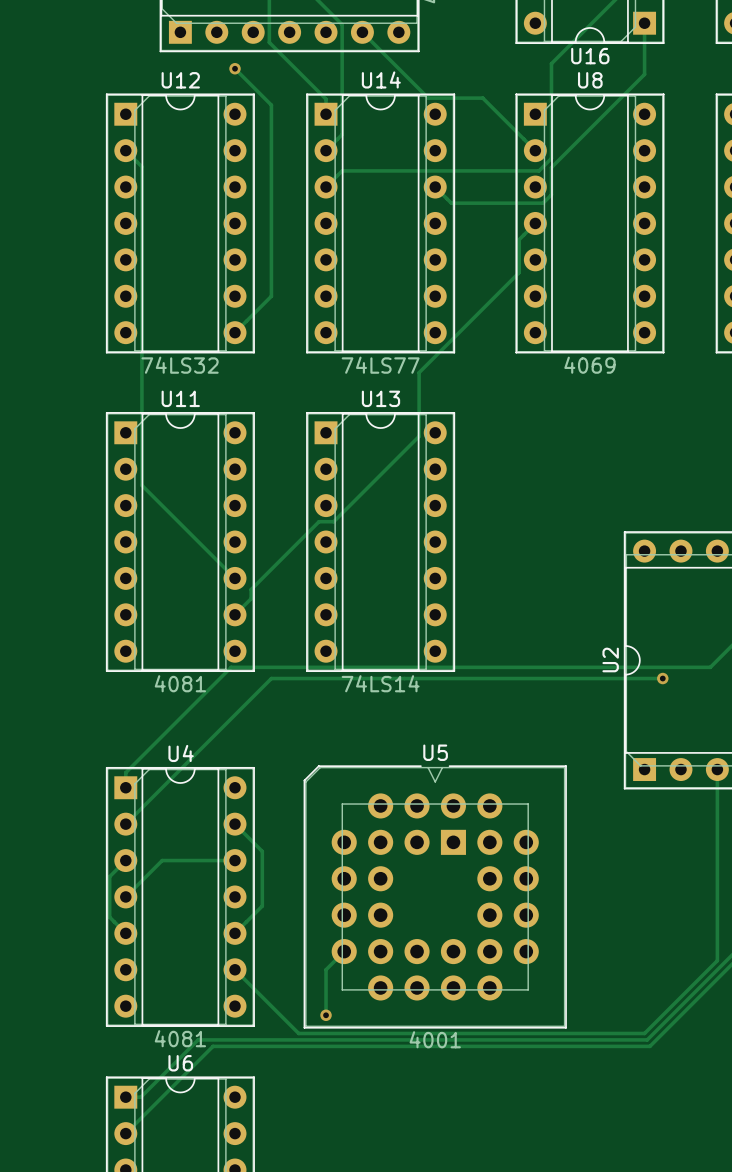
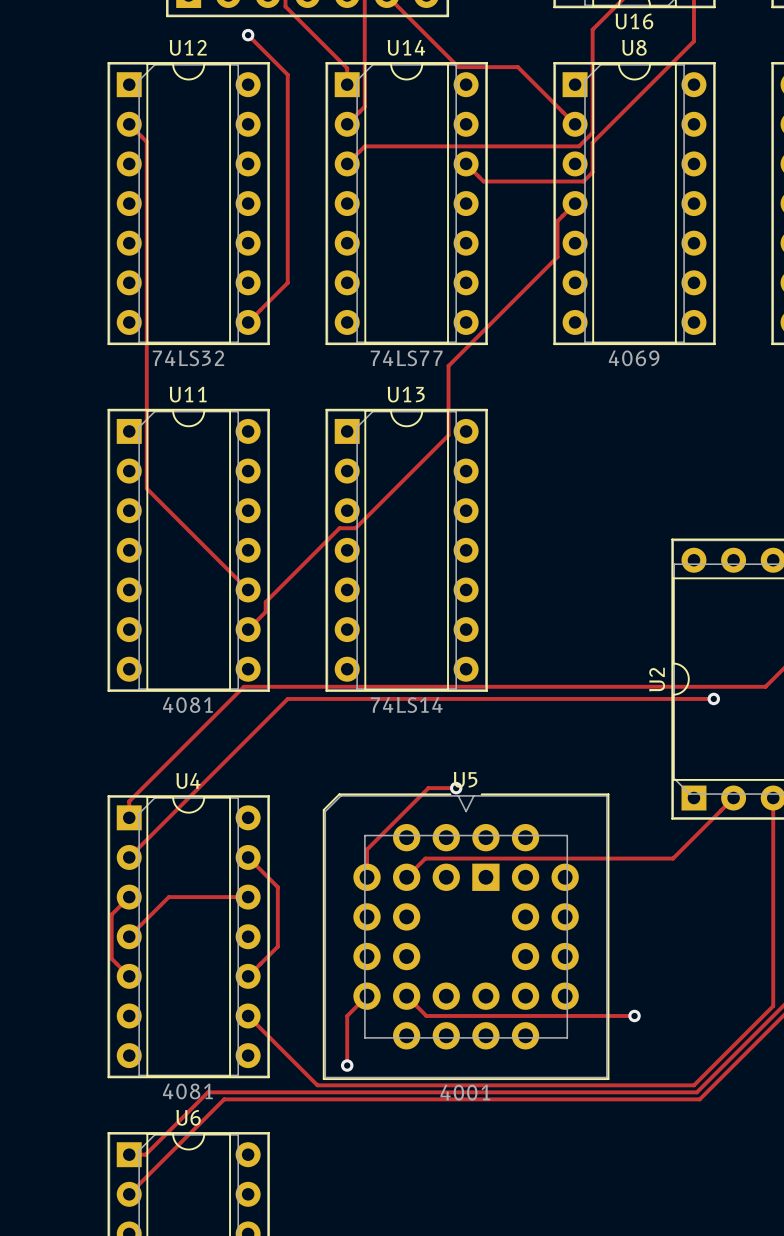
track: none -> (456, 788) (428, 788) (367, 849) (367, 877)
via: none -> (456, 788)
track: none -> (733, 798) (673, 858) (425, 858) (406, 877)
track: none -> (406, 996) (426, 1015) (634, 1015)
via: none -> (634, 1015)

